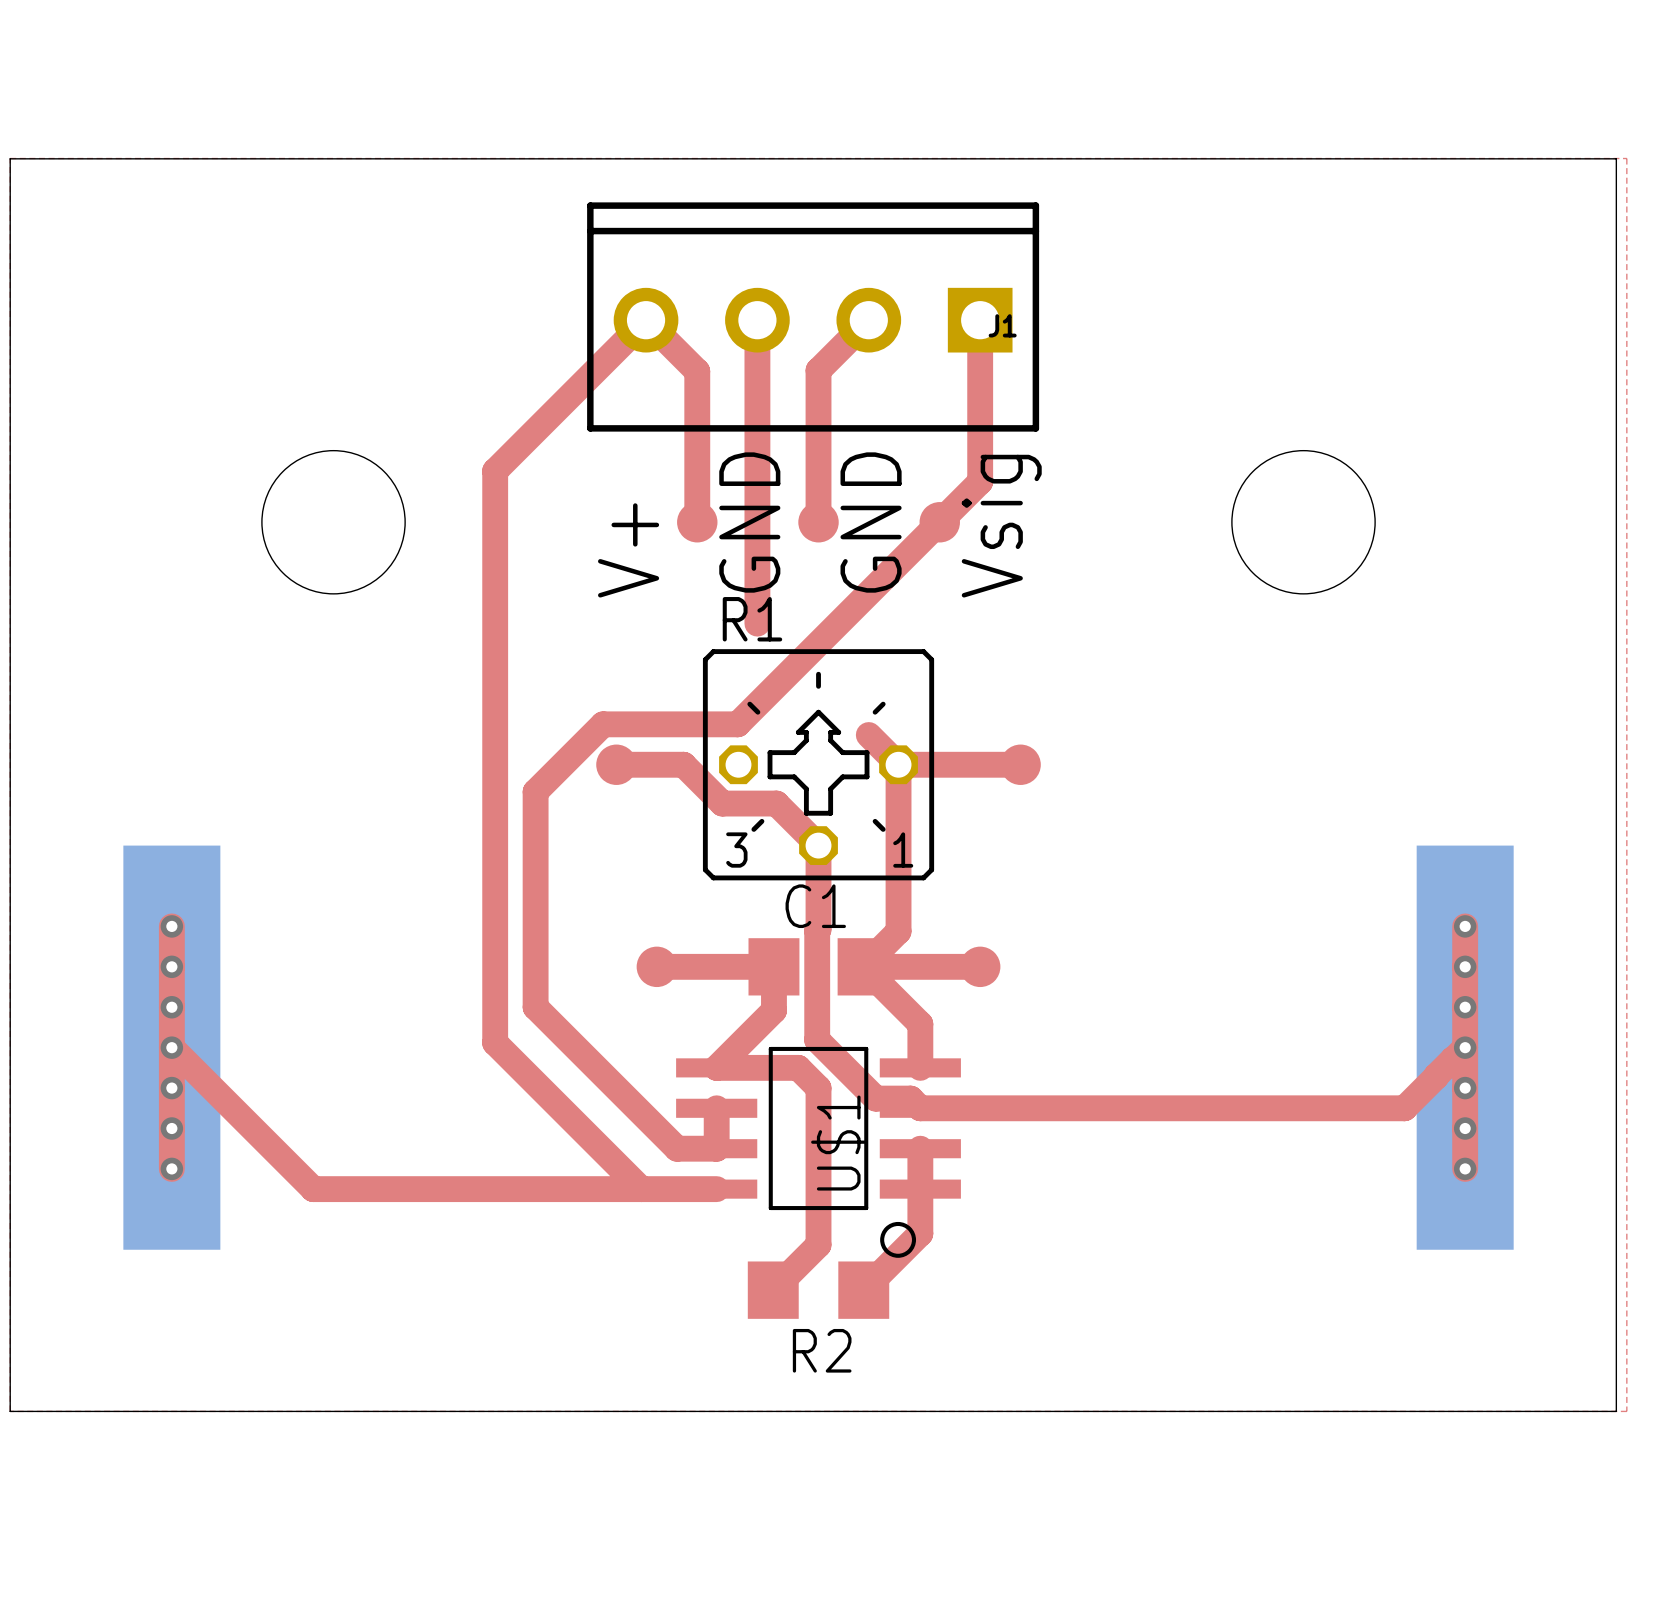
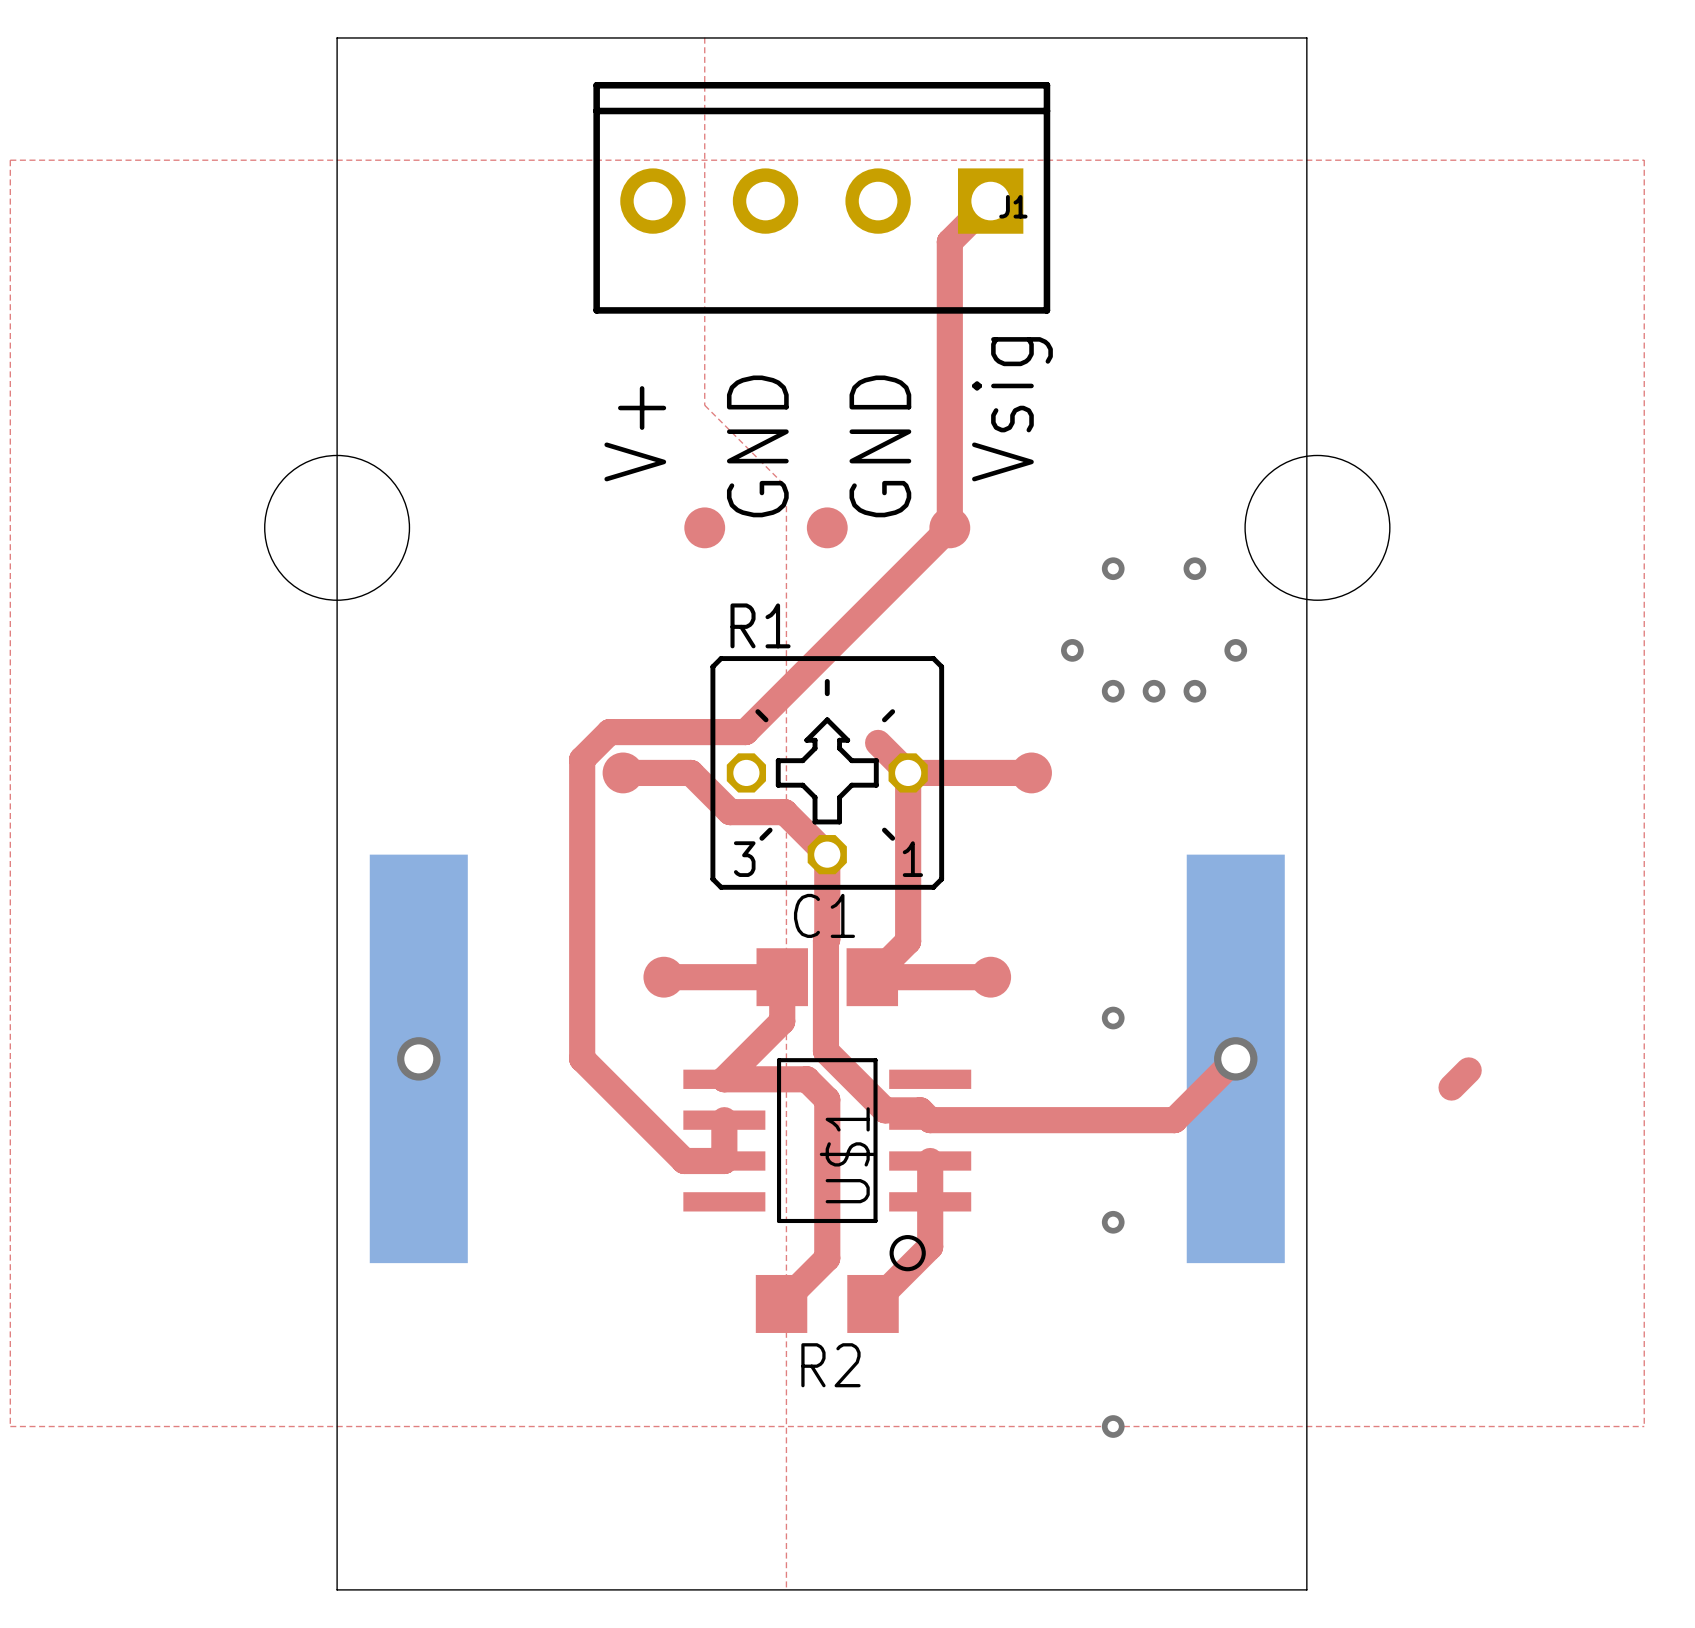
top zone outline: none -> (704, 37) (704, 405) (786, 487) (786, 1589)
board edge: (10, 158) (1616, 158) (1616, 1411) (10, 1411) (10, 158) -> (337, 37) (337, 1589) (1306, 1589) (1306, 37) (337, 37)
J1 position: (813, 316) -> (821, 197)
top track: (757, 320) (757, 623) -> none
top track: (868, 320) (818, 370) (818, 522) -> none
top track: (980, 320) (980, 481) (939, 522) -> (990, 201) (949, 241) (949, 527)
top track: (697, 522) (697, 371) (646, 320) (495, 471) (495, 1042) (641, 1189) -> none
text position: GND (749, 522) -> GND (757, 446)
text position: GND (871, 522) -> GND (880, 446)
text position: Vsig (1001, 526) -> Vsig (1012, 409)
text position: V+ (628, 550) -> V+ (635, 433)
via: none -> (1113, 568)
via: none -> (1194, 568)
via: none -> (1072, 650)
via: none -> (1235, 650)
via: none -> (1113, 691)
via: none -> (1154, 691)
via: none -> (1194, 691)
top track: (576, 751) (535, 791) (535, 1007) (576, 1047) -> (582, 759) (582, 1058)
top track: (171, 926) (171, 1168) -> none
via: (171, 926) -> none
top track: (1465, 926) (1465, 1168) -> none
via: (1465, 926) -> none
via: (171, 966) -> none
top track: (863, 966) (920, 1024) (920, 1067) -> none
via: (1465, 966) -> none
via: (171, 1007) -> none
via: none -> (1113, 1018)
via: (1465, 1007) -> none
top track: (171, 1047) (313, 1189) (716, 1189) -> none
part position: (171, 1047) -> (418, 1058)
via: (171, 1047) -> none
via: none -> (418, 1058)
via: none -> (1235, 1058)
part position: (1465, 1047) -> (1235, 1058)
via: (1465, 1047) -> none
top track: (1436, 1076) (1404, 1108) (1162, 1108) -> (1235, 1058) (1174, 1120)
via: (171, 1088) -> none
via: (1465, 1088) -> none
via: (171, 1128) -> none
via: (1465, 1128) -> none
via: (171, 1168) -> none
via: (1465, 1168) -> none
via: none -> (1113, 1222)
via: none -> (1113, 1426)

